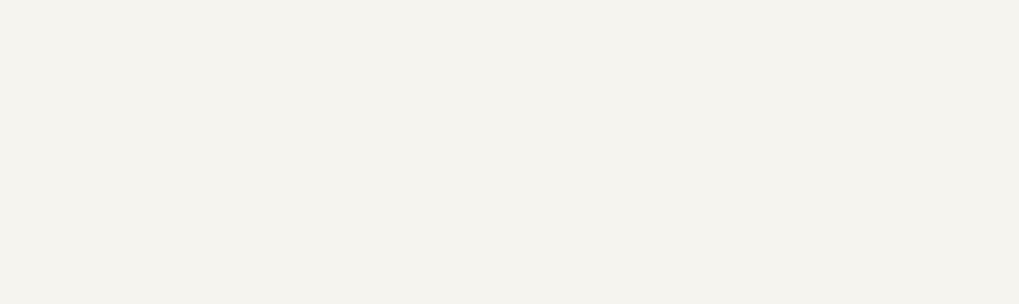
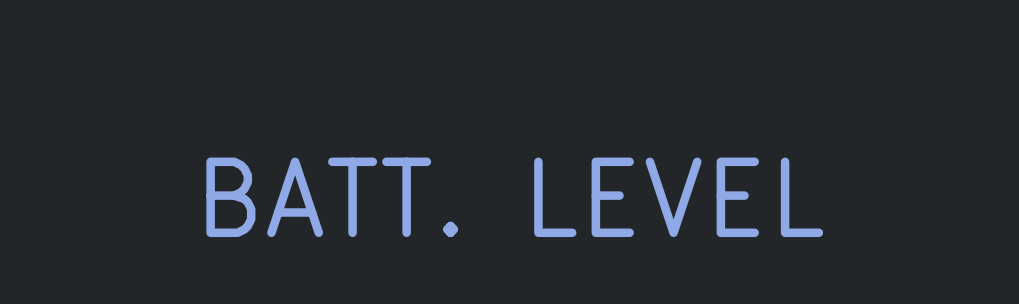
text: none -> BATT. LEVEL (514, 197)

